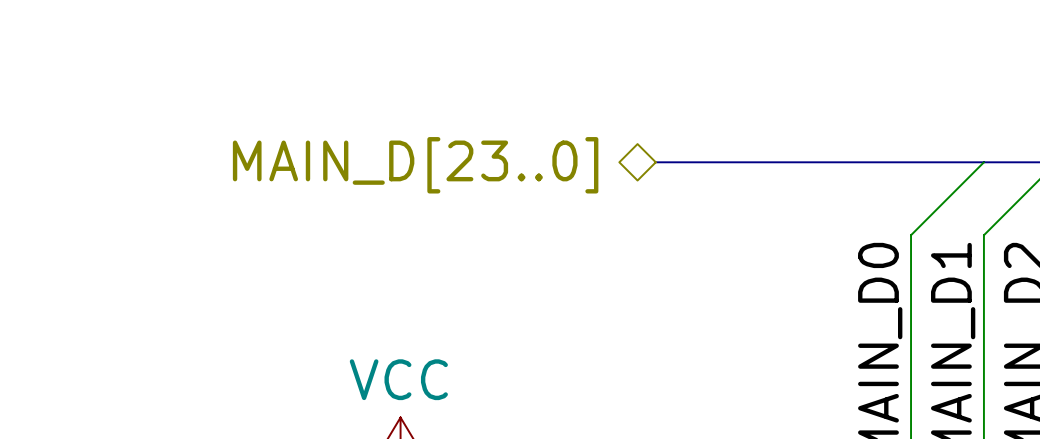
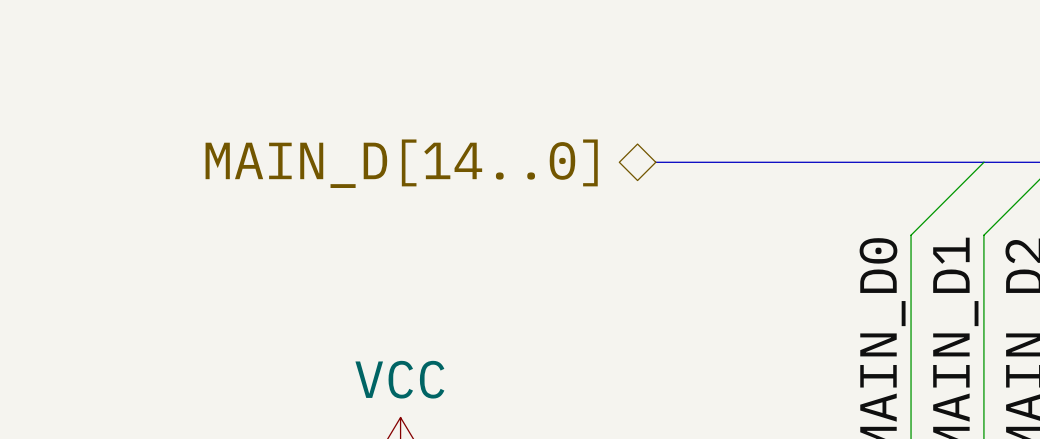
hierarchical label: MAIN_D[23..0] (415, 165) -> MAIN_D[14..0] (401, 163)

